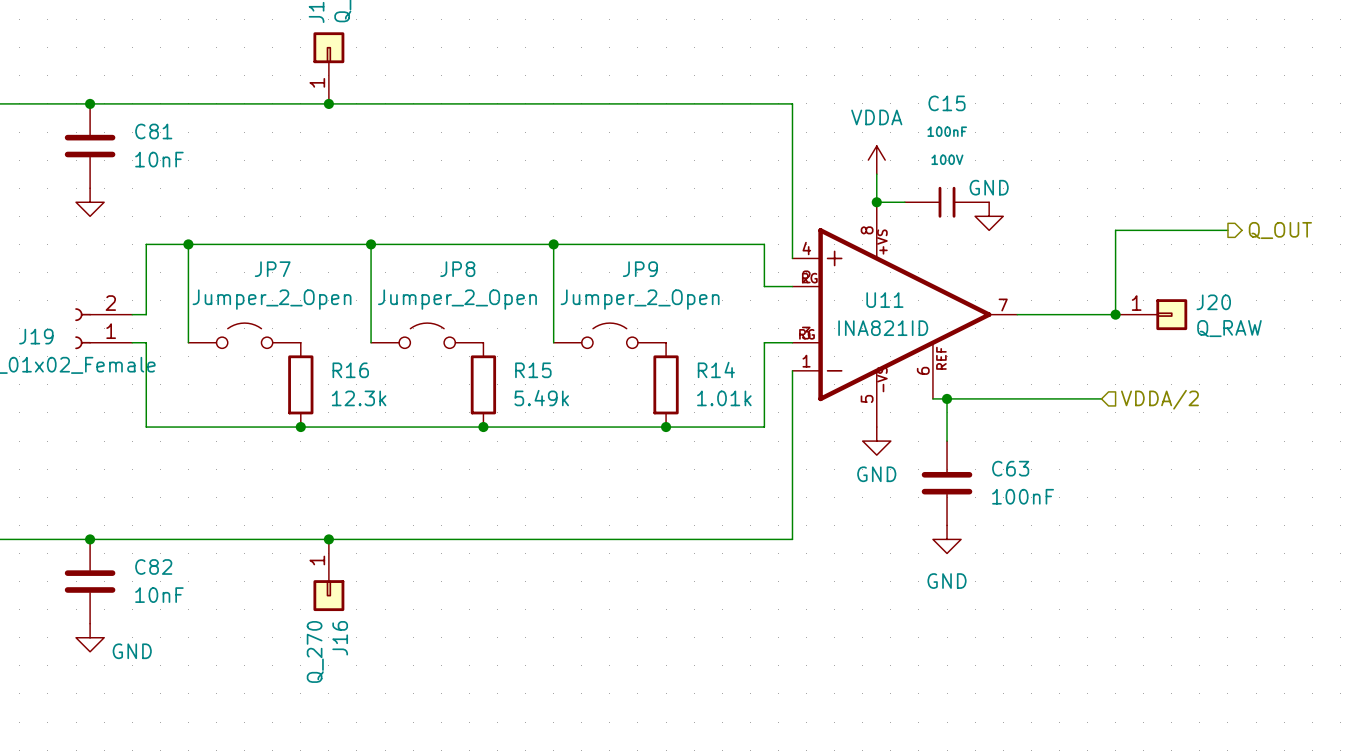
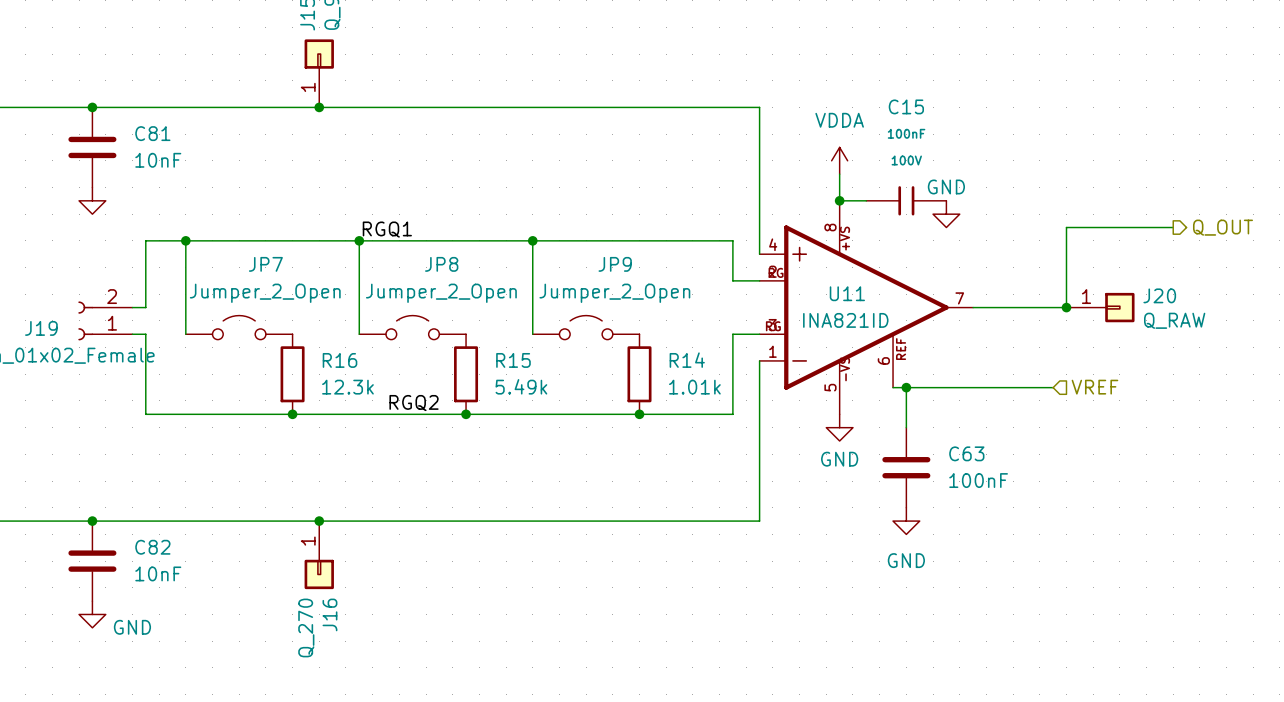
label: none -> RGQ1 (387, 229)
hierarchical label: VDDA/2 (1159, 399) -> VREF (1094, 387)
label: none -> RGQ2 (414, 403)

